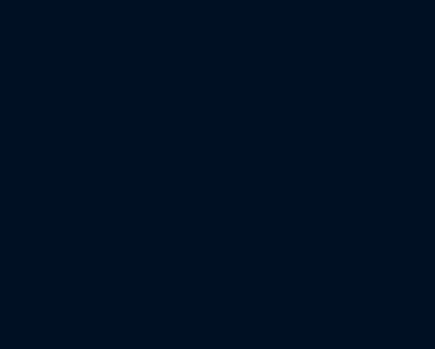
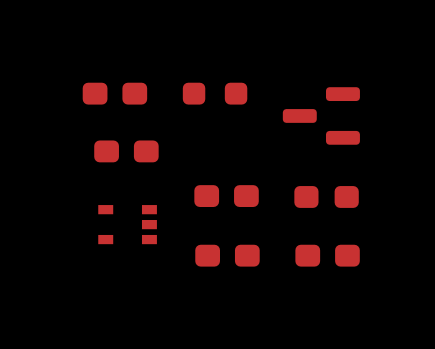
part: none -> (114, 93)
part: none -> (215, 93)
part: none -> (321, 115)
part: none -> (126, 151)
part: none -> (226, 196)
part: none -> (326, 196)
part: none -> (127, 224)
part: none -> (227, 255)
part: none -> (327, 255)

